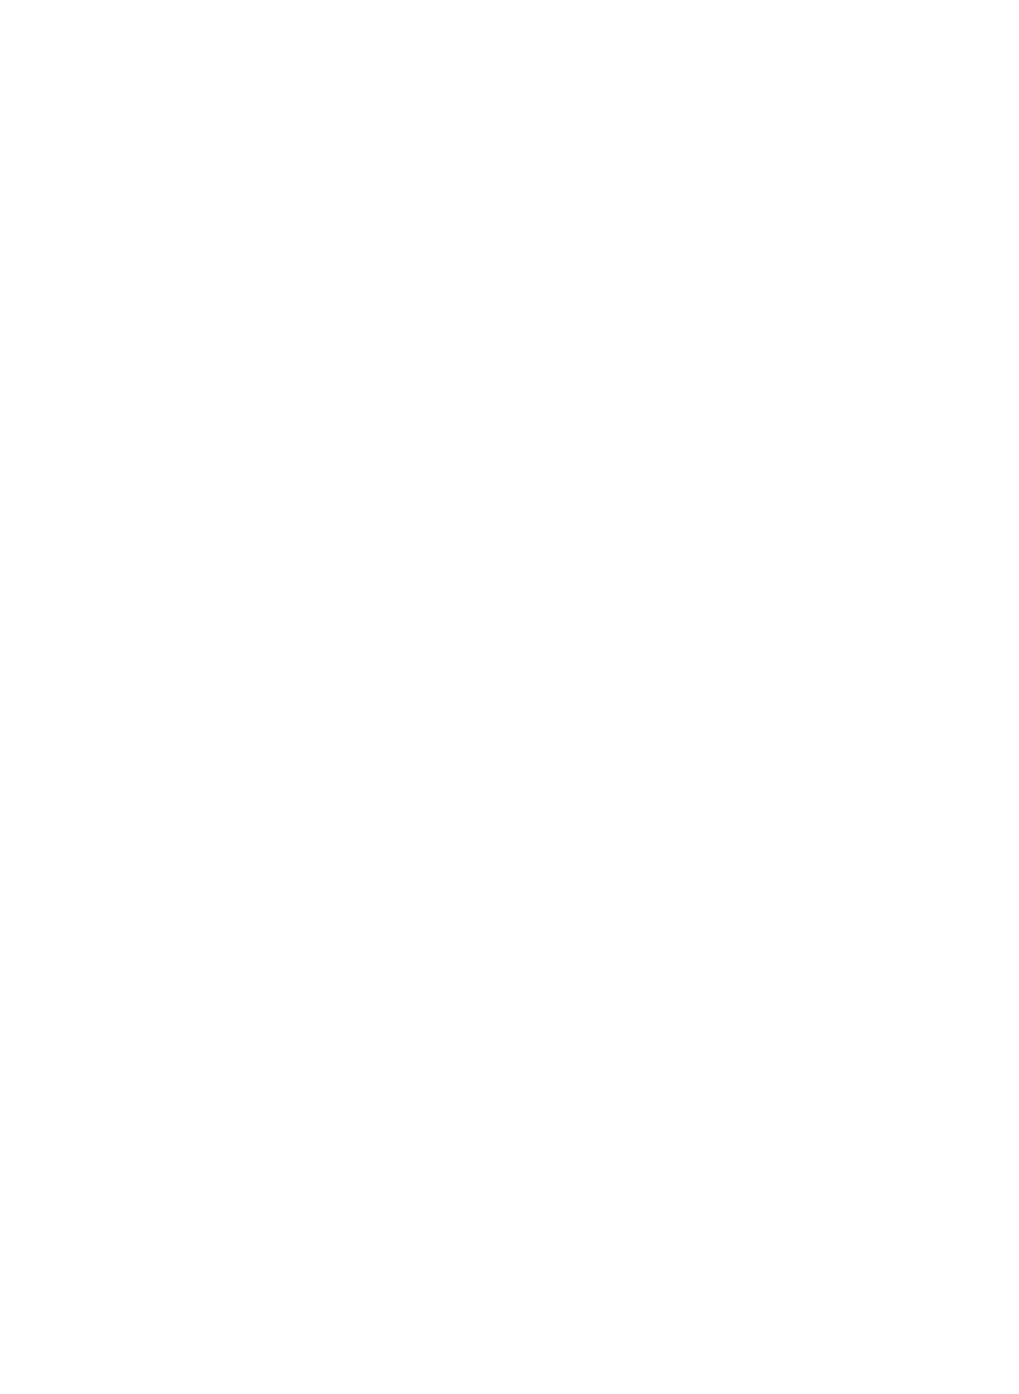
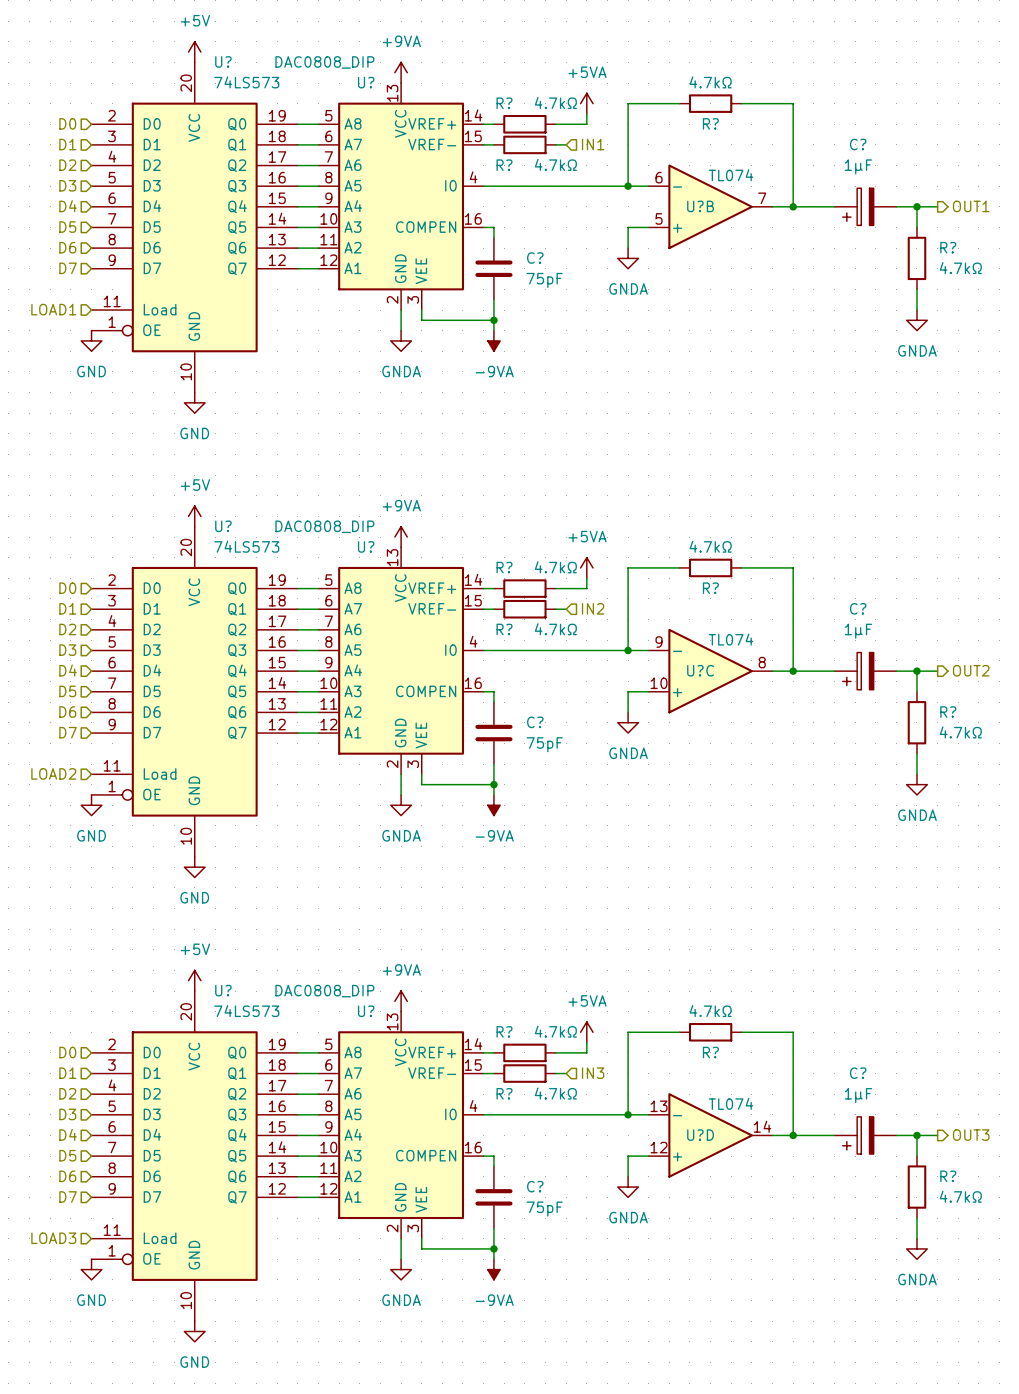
power symbol: none -> +5V (194, 52)
power symbol: none -> +9VA (401, 72)
power symbol: none -> +5VA (586, 103)
wire: none -> (679, 103) (628, 103) (628, 186)
R?: none -> 4.7kΩ (710, 103)
wire: none -> (741, 103) (793, 103) (793, 206)
wire: none -> (586, 113) (586, 124) (555, 124)
hierarchical label: none -> D0 (67, 123)
wire: none -> (297, 124) (318, 124)
wire: none -> (483, 124) (493, 124)
R?: none -> 4.7kΩ (524, 124)
hierarchical label: none -> D1 (67, 144)
wire: none -> (297, 144) (318, 144)
wire: none -> (483, 144) (493, 144)
R?: none -> 4.7kΩ (524, 144)
wire: none -> (555, 144) (566, 144)
hierarchical label: none -> IN1 (593, 144)
hierarchical label: none -> D2 (67, 165)
wire: none -> (297, 165) (318, 165)
hierarchical label: none -> D3 (67, 185)
wire: none -> (297, 186) (318, 186)
wire: none -> (483, 186) (648, 186)
junction: none -> (628, 186)
U?: none -> DAC0808_DIP (401, 196)
hierarchical label: none -> D4 (68, 206)
wire: none -> (297, 206) (318, 206)
U?B: none -> TL074 (710, 206)
wire: none -> (772, 206) (834, 206)
junction: none -> (793, 206)
C?: none -> 1μF (865, 206)
wire: none -> (896, 206) (937, 206)
wire: none -> (916, 206) (916, 227)
junction: none -> (916, 206)
hierarchical label: none -> OUT1 (971, 206)
hierarchical label: none -> D5 (67, 227)
U?: none -> 74LS573 (194, 227)
wire: none -> (297, 227) (318, 227)
wire: none -> (483, 227) (493, 227) (493, 237)
wire: none -> (648, 227) (628, 227) (628, 248)
hierarchical label: none -> D6 (67, 247)
wire: none -> (297, 248) (318, 248)
power symbol: none -> GNDA (628, 258)
R?: none -> 4.7kΩ (916, 258)
hierarchical label: none -> D7 (68, 268)
wire: none -> (297, 268) (318, 268)
C?: none -> 75pF (493, 268)
wire: none -> (916, 289) (916, 310)
wire: none -> (493, 299) (493, 330)
hierarchical label: none -> LOAD1 (53, 309)
wire: none -> (401, 310) (401, 330)
wire: none -> (421, 310) (421, 320) (493, 320)
junction: none -> (493, 320)
power symbol: none -> GNDA (916, 320)
power symbol: none -> GND (91, 340)
power symbol: none -> GNDA (401, 340)
power symbol: none -> -9VA (493, 340)
power symbol: none -> GND (194, 402)
power symbol: none -> +5V (194, 516)
power symbol: none -> +9VA (401, 537)
power symbol: none -> +5VA (586, 567)
wire: none -> (679, 567) (628, 567) (628, 650)
R?: none -> 4.7kΩ (710, 567)
wire: none -> (741, 567) (793, 567) (793, 671)
wire: none -> (586, 578) (586, 588) (555, 588)
hierarchical label: none -> D0 (67, 588)
wire: none -> (297, 588) (318, 588)
wire: none -> (483, 588) (493, 588)
R?: none -> 4.7kΩ (524, 588)
hierarchical label: none -> D1 (67, 608)
hierarchical label: none -> IN2 (593, 608)
wire: none -> (297, 609) (318, 609)
wire: none -> (483, 609) (493, 609)
R?: none -> 4.7kΩ (524, 609)
wire: none -> (555, 609) (566, 609)
hierarchical label: none -> D2 (67, 629)
wire: none -> (297, 629) (318, 629)
hierarchical label: none -> D3 (67, 650)
wire: none -> (297, 650) (318, 650)
wire: none -> (483, 650) (648, 650)
junction: none -> (628, 650)
U?: none -> DAC0808_DIP (401, 660)
hierarchical label: none -> D4 (68, 670)
hierarchical label: none -> OUT2 (971, 670)
wire: none -> (297, 671) (318, 671)
U?C: none -> TL074 (710, 671)
wire: none -> (772, 671) (834, 671)
junction: none -> (793, 671)
C?: none -> 1μF (865, 671)
wire: none -> (896, 671) (937, 671)
wire: none -> (916, 671) (916, 691)
junction: none -> (916, 671)
hierarchical label: none -> D5 (67, 691)
U?: none -> 74LS573 (194, 691)
wire: none -> (297, 691) (318, 691)
wire: none -> (483, 691) (493, 691) (493, 702)
wire: none -> (648, 691) (628, 691) (628, 712)
hierarchical label: none -> D6 (67, 712)
wire: none -> (297, 712) (318, 712)
power symbol: none -> GNDA (628, 722)
R?: none -> 4.7kΩ (916, 722)
hierarchical label: none -> D7 (68, 732)
wire: none -> (297, 733) (318, 733)
C?: none -> 75pF (493, 733)
wire: none -> (916, 753) (916, 774)
wire: none -> (493, 764) (493, 794)
hierarchical label: none -> LOAD2 (53, 773)
wire: none -> (401, 774) (401, 794)
wire: none -> (421, 774) (421, 784) (493, 784)
junction: none -> (493, 784)
power symbol: none -> GNDA (916, 784)
power symbol: none -> GND (91, 805)
power symbol: none -> GNDA (401, 805)
power symbol: none -> -9VA (493, 805)
power symbol: none -> GND (194, 867)
power symbol: none -> +5V (194, 980)
power symbol: none -> +9VA (401, 1001)
power symbol: none -> +5VA (586, 1032)
wire: none -> (679, 1032) (628, 1032) (628, 1114)
R?: none -> 4.7kΩ (710, 1032)
wire: none -> (741, 1032) (793, 1032) (793, 1135)
wire: none -> (586, 1042) (586, 1052) (555, 1052)
hierarchical label: none -> D0 (67, 1052)
wire: none -> (297, 1052) (318, 1052)
wire: none -> (483, 1052) (493, 1052)
R?: none -> 4.7kΩ (524, 1052)
hierarchical label: none -> D1 (67, 1073)
wire: none -> (297, 1073) (318, 1073)
wire: none -> (483, 1073) (493, 1073)
R?: none -> 4.7kΩ (524, 1073)
wire: none -> (555, 1073) (566, 1073)
hierarchical label: none -> IN3 (593, 1073)
hierarchical label: none -> D2 (67, 1093)
wire: none -> (297, 1094) (318, 1094)
hierarchical label: none -> D3 (67, 1114)
wire: none -> (297, 1114) (318, 1114)
wire: none -> (483, 1114) (648, 1114)
junction: none -> (628, 1114)
U?: none -> DAC0808_DIP (401, 1125)
hierarchical label: none -> D4 (68, 1134)
wire: none -> (297, 1135) (318, 1135)
U?D: none -> TL074 (710, 1135)
wire: none -> (772, 1135) (834, 1135)
junction: none -> (793, 1135)
C?: none -> 1μF (865, 1135)
wire: none -> (896, 1135) (937, 1135)
wire: none -> (916, 1135) (916, 1156)
junction: none -> (916, 1135)
hierarchical label: none -> OUT3 (971, 1135)
hierarchical label: none -> D5 (67, 1155)
U?: none -> 74LS573 (194, 1156)
wire: none -> (297, 1156) (318, 1156)
wire: none -> (483, 1156) (493, 1156) (493, 1166)
wire: none -> (648, 1156) (628, 1156) (628, 1176)
hierarchical label: none -> D6 (67, 1176)
wire: none -> (297, 1176) (318, 1176)
power symbol: none -> GNDA (628, 1187)
R?: none -> 4.7kΩ (916, 1187)
hierarchical label: none -> D7 (68, 1196)
wire: none -> (297, 1197) (318, 1197)
C?: none -> 75pF (493, 1197)
wire: none -> (916, 1218) (916, 1238)
wire: none -> (493, 1228) (493, 1259)
hierarchical label: none -> LOAD3 (53, 1238)
wire: none -> (401, 1238) (401, 1259)
wire: none -> (421, 1238) (421, 1248) (493, 1248)
junction: none -> (493, 1248)
power symbol: none -> GNDA (916, 1248)
power symbol: none -> GND (91, 1269)
power symbol: none -> GNDA (401, 1269)
power symbol: none -> -9VA (493, 1269)
power symbol: none -> GND (194, 1331)

